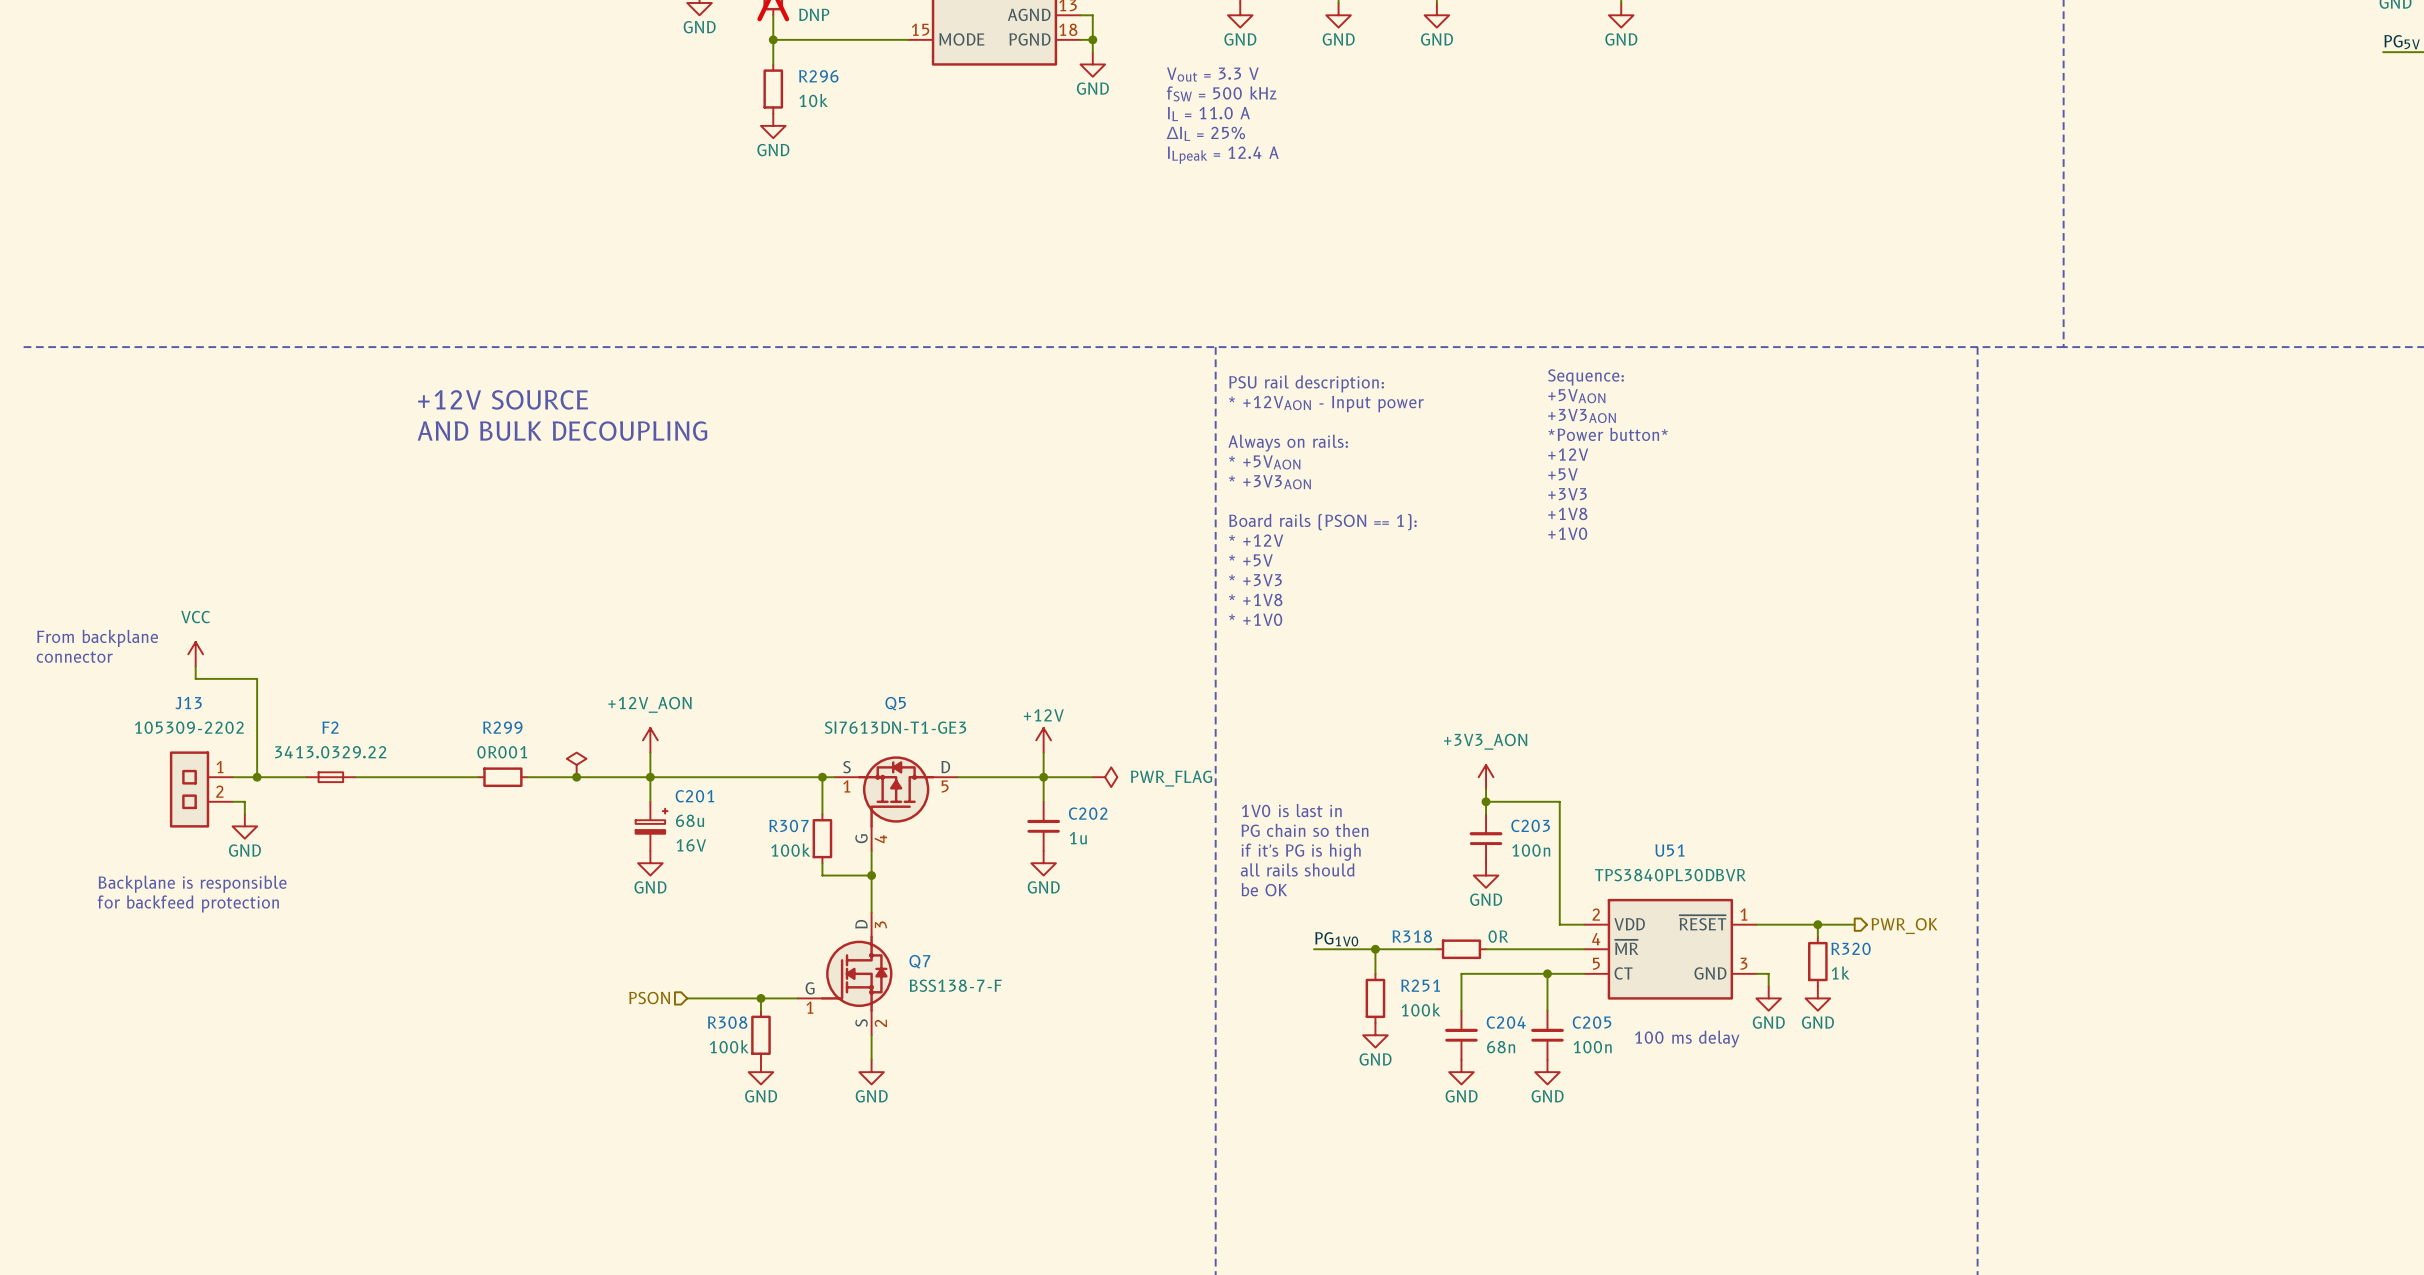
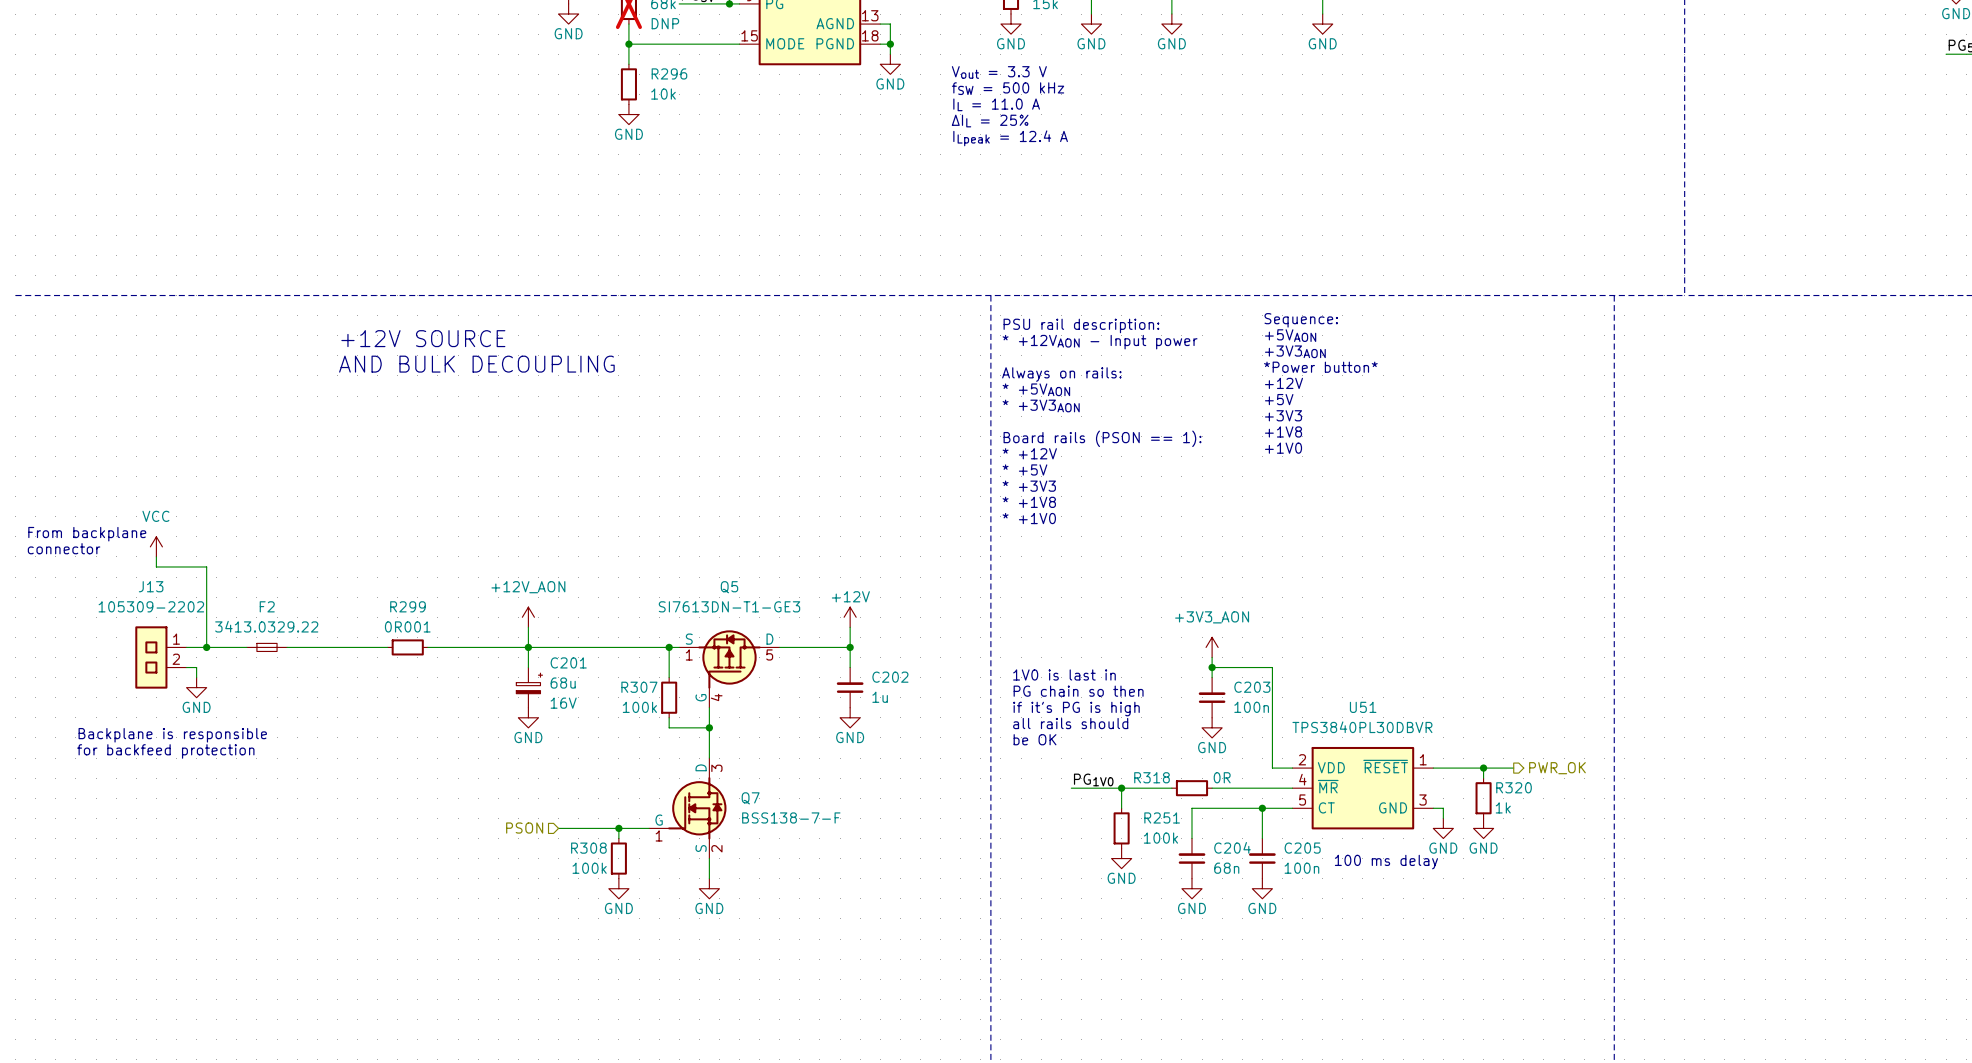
power symbol: (576, 764) -> none
junction: (576, 777) -> none
wire: (1043, 777) (1092, 777) -> none
power symbol: PWR_FLAG (1105, 777) -> none

